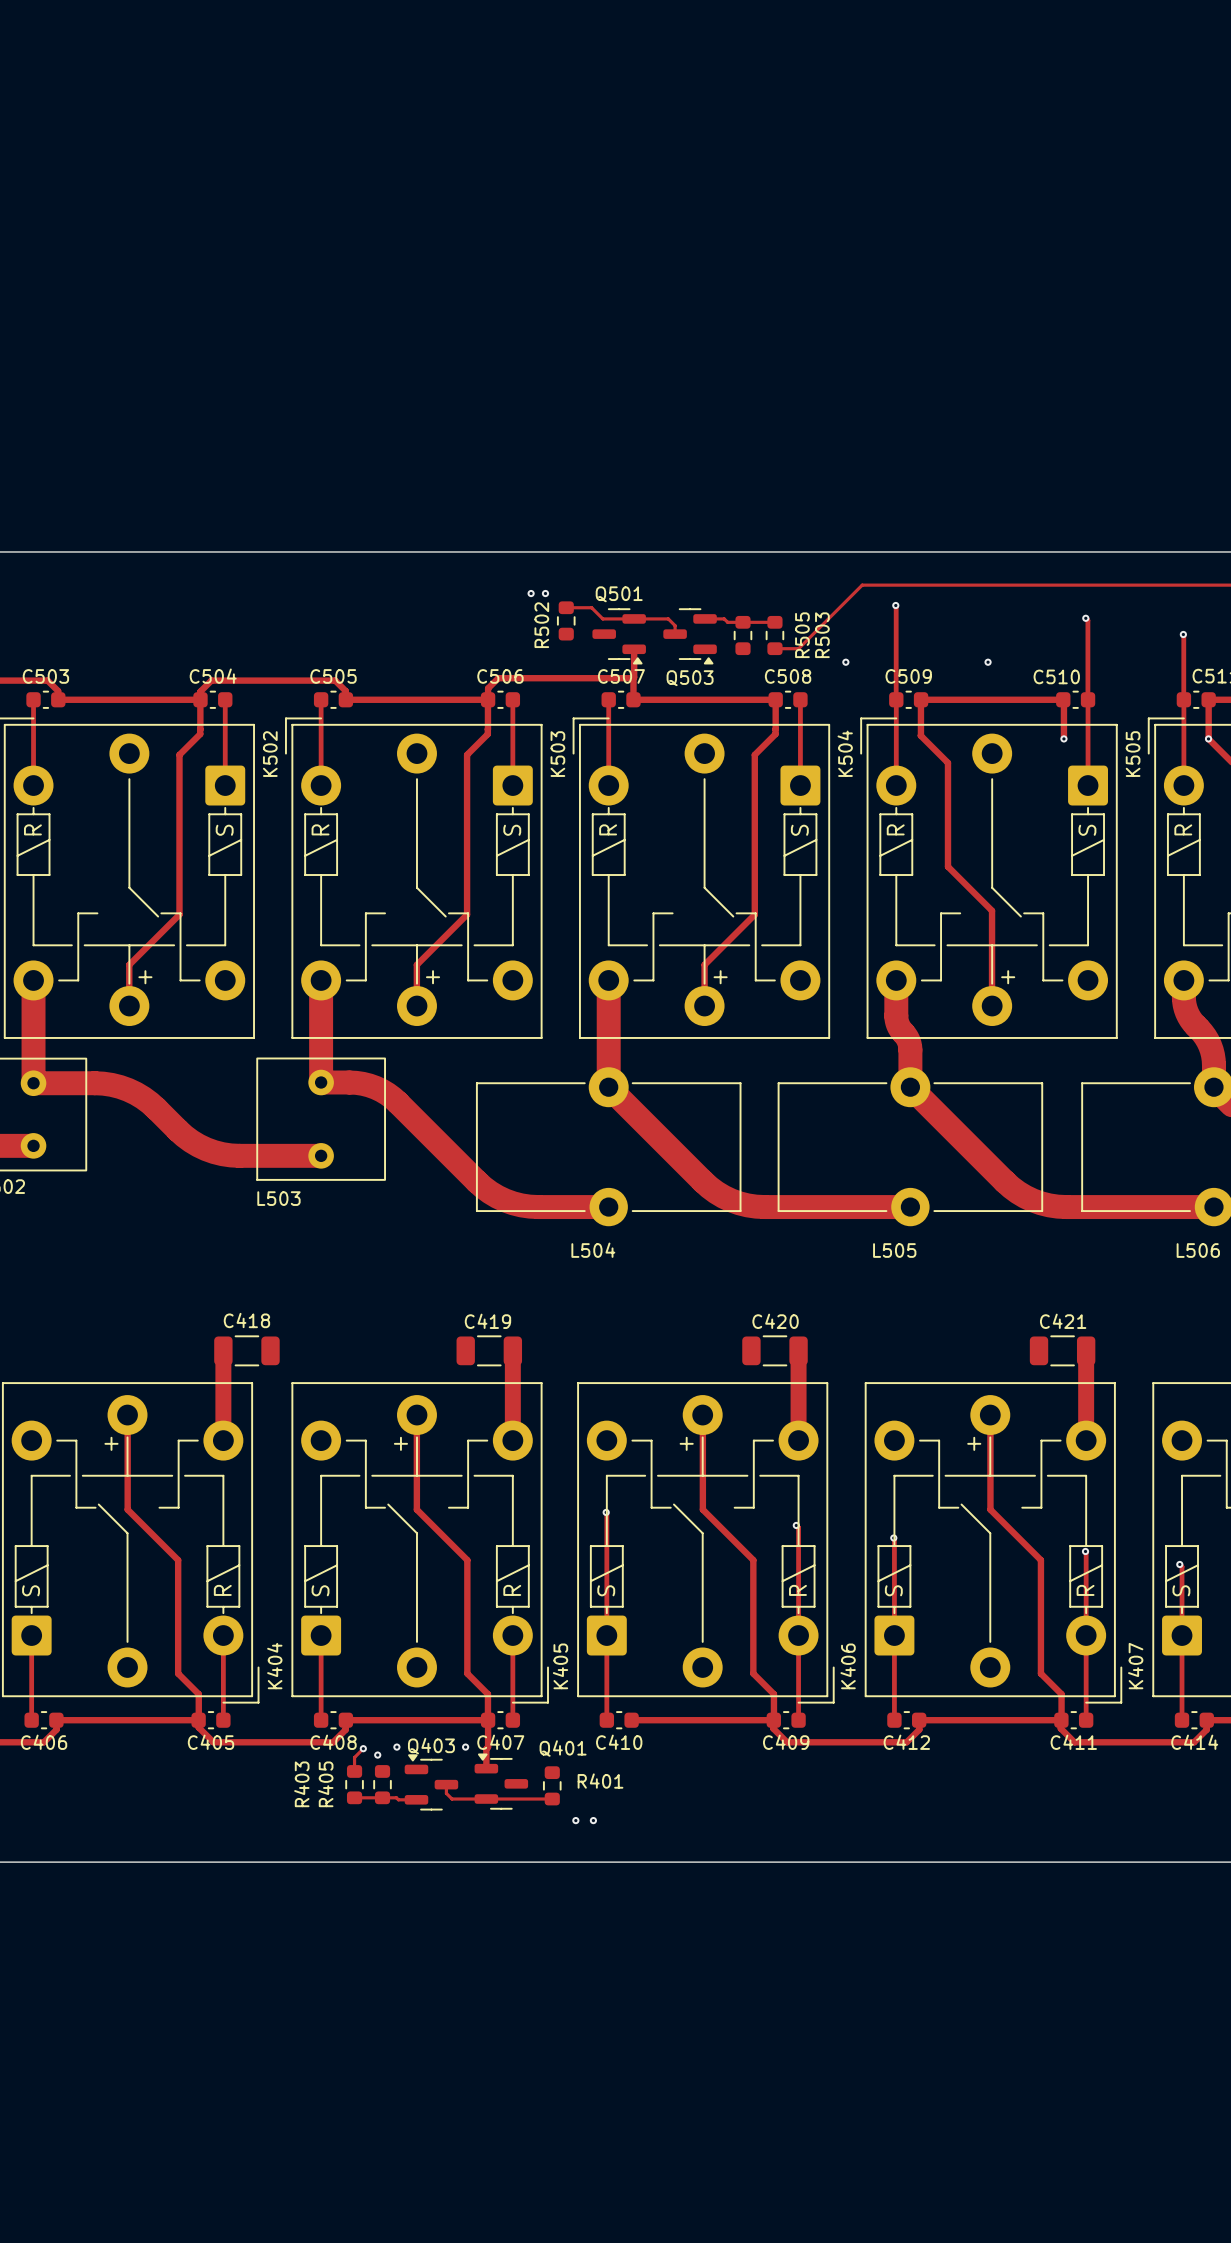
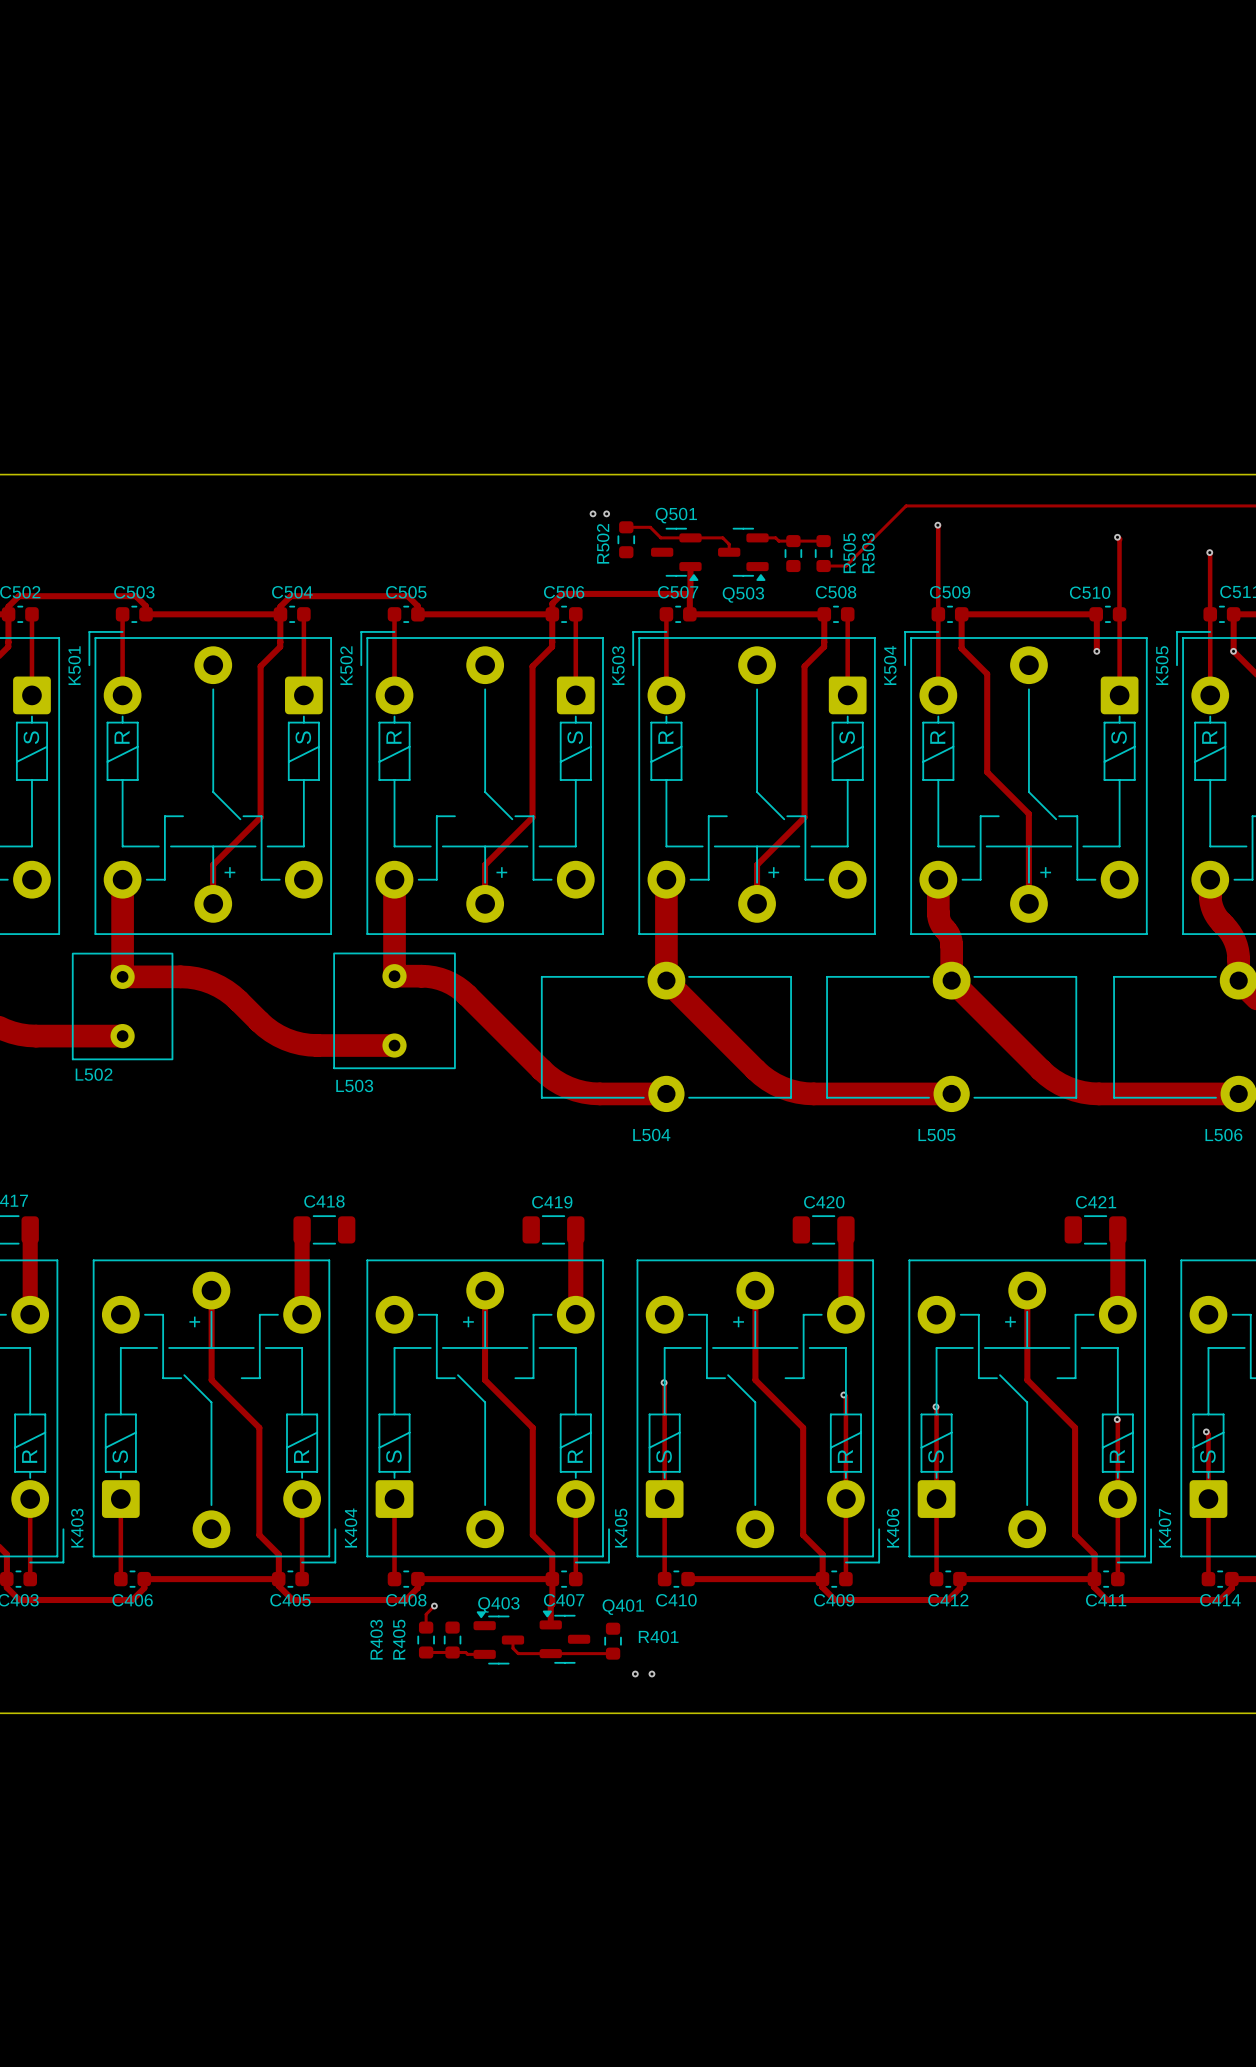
via: (845, 662) -> none
via: (988, 662) -> none
via: (396, 1747) -> none
via: (465, 1747) -> none
via: (377, 1755) -> none

